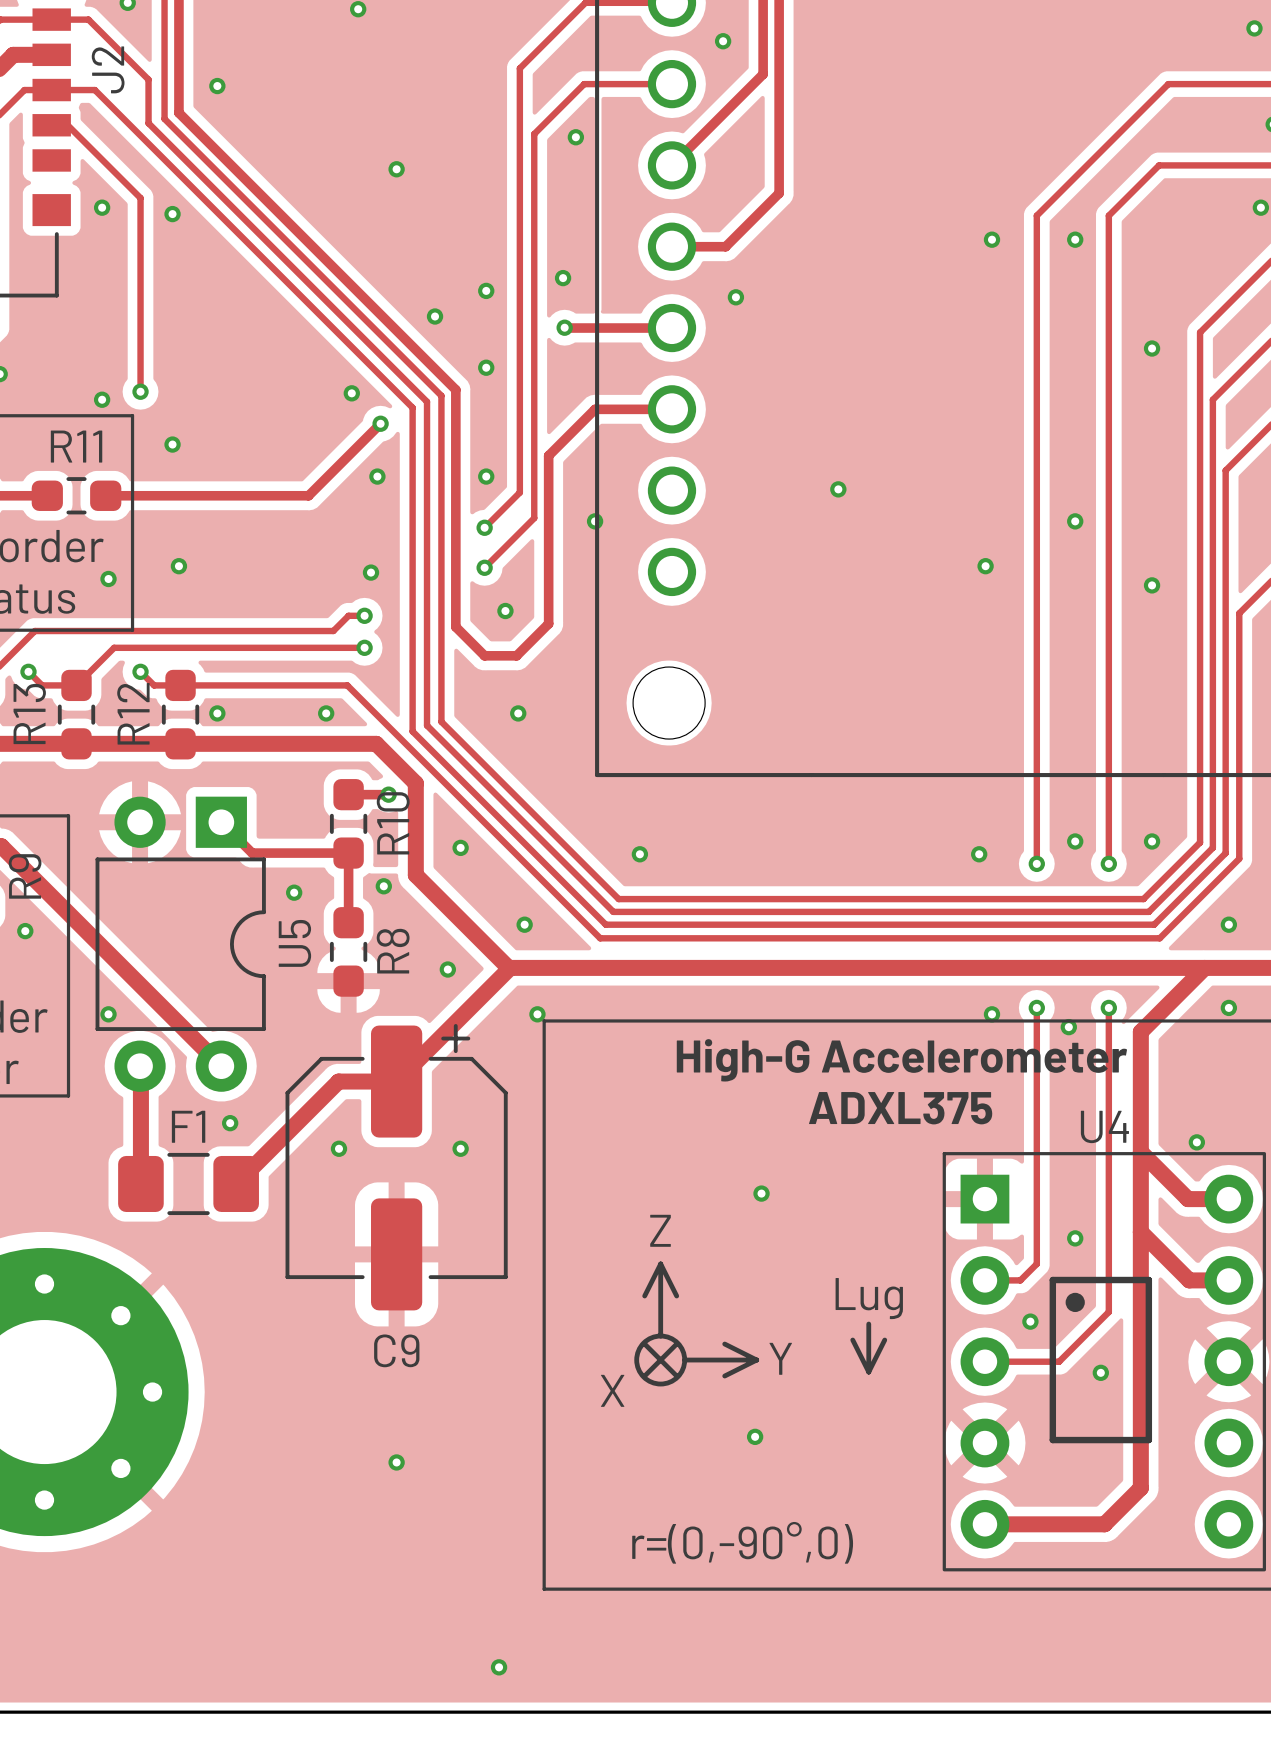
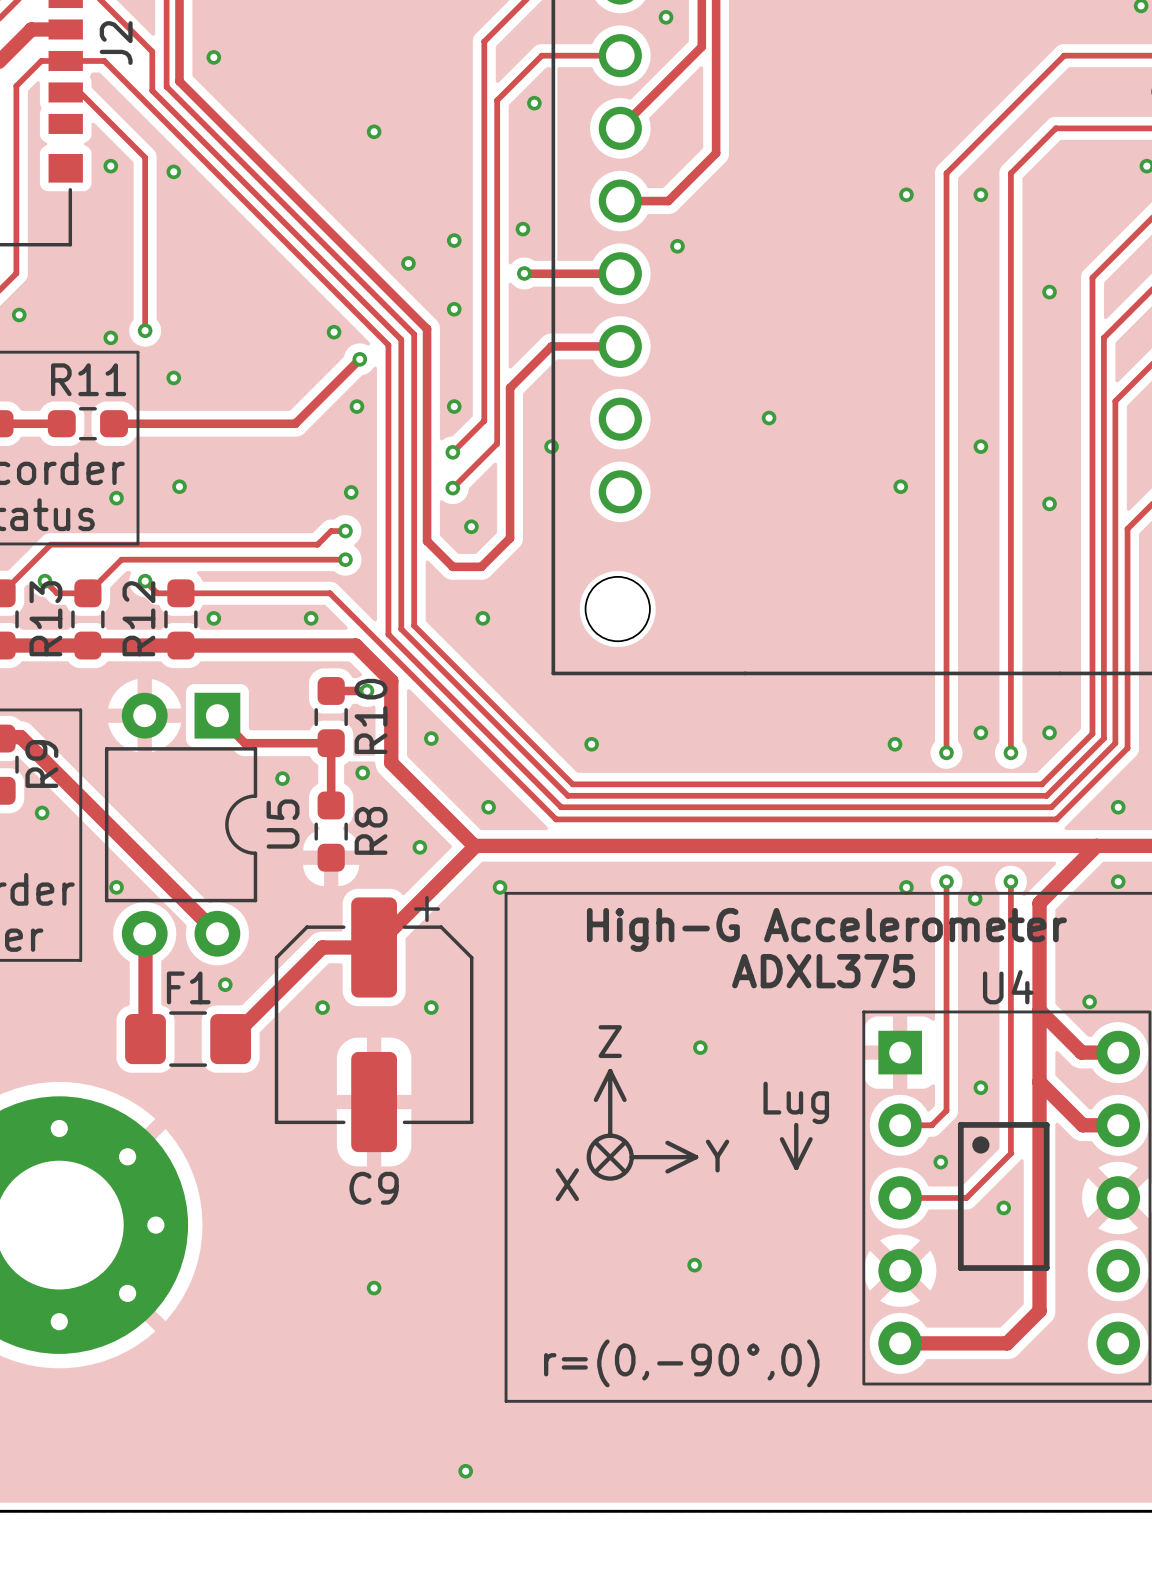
text position: Z (660, 1230) -> Z (610, 1041)
line: (660, 1292) (660, 1336) -> (610, 1071) (610, 1110)
line: (644, 1296) (660, 1264) (676, 1296) -> none
line: none -> (781, 1139) (796, 1167) (810, 1139)
text position: Lug (869, 1298) -> Lug (796, 1102)
line: (868, 1328) (868, 1372) -> (796, 1124) (796, 1164)
line: (852, 1340) (868, 1372) -> (610, 1071) (624, 1099)
line: (884, 1340) (868, 1372) -> (610, 1071) (595, 1099)
line: (644, 1344) (676, 1376) -> (595, 1142) (624, 1171)
line: (676, 1344) (644, 1376) -> (624, 1142) (595, 1171)
line: (724, 1344) (756, 1360) -> (667, 1142) (696, 1157)
text position: Y (780, 1358) -> Y (717, 1156)
drawing position: (660, 1360) -> (610, 1157)
line: (684, 1360) (756, 1360) -> (631, 1157) (696, 1157)
line: (756, 1360) (724, 1376) -> (696, 1157) (667, 1171)
text position: X (612, 1390) -> X (567, 1184)

